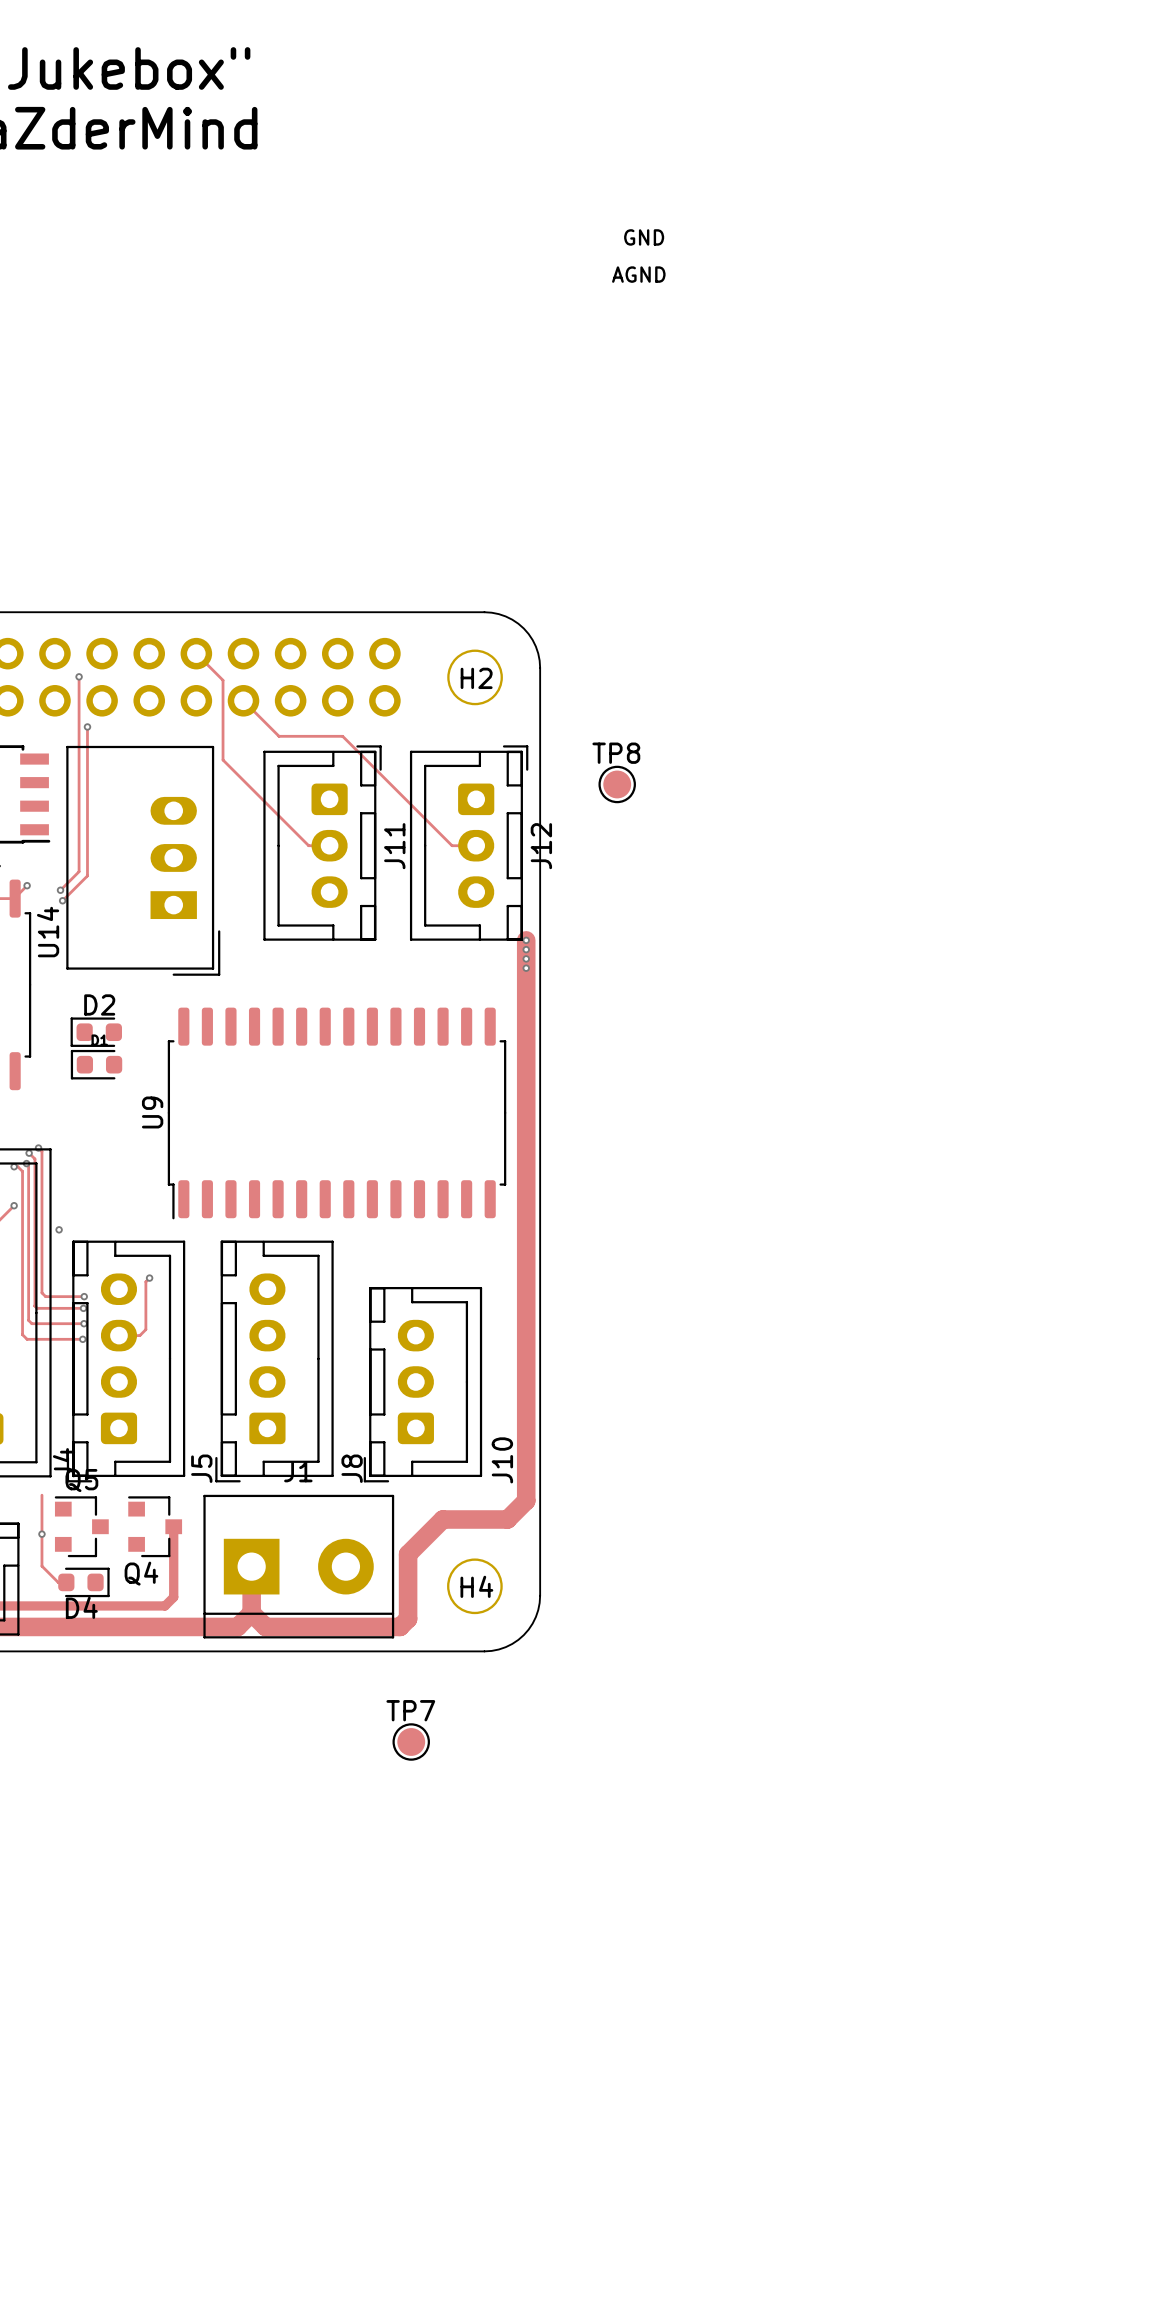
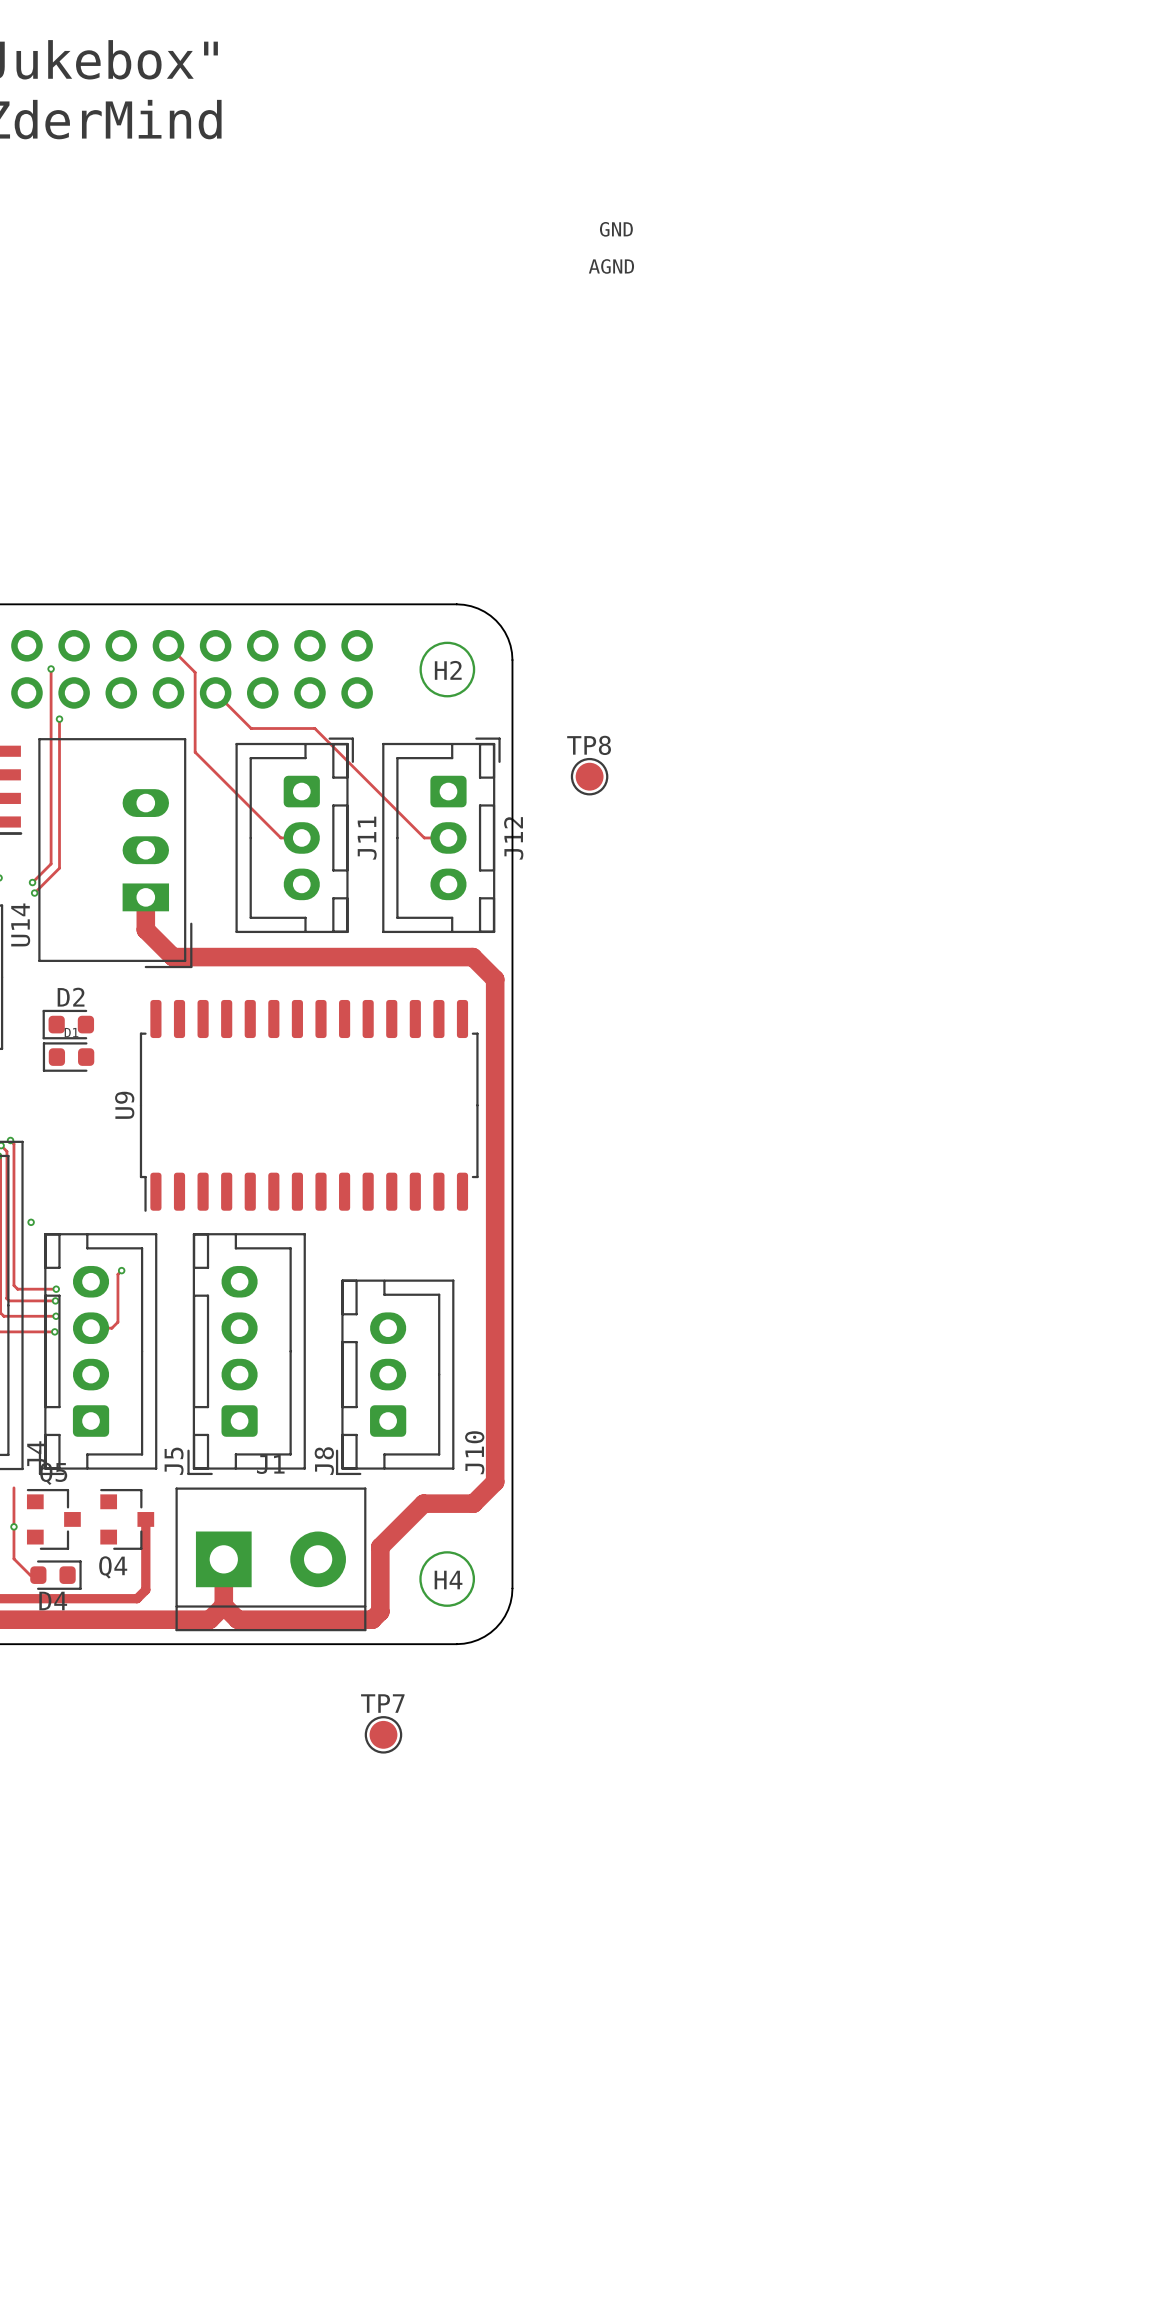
track: (526, 940) (526, 1500) (507, 1519) (442, 1519) -> (145, 897) (145, 929) (173, 957) (472, 957) (495, 979) (495, 1482) (473, 1503) (423, 1503) (415, 1512)
via: (526, 940) -> none
via: (526, 949) -> none
via: (526, 958) -> none
via: (526, 968) -> none

